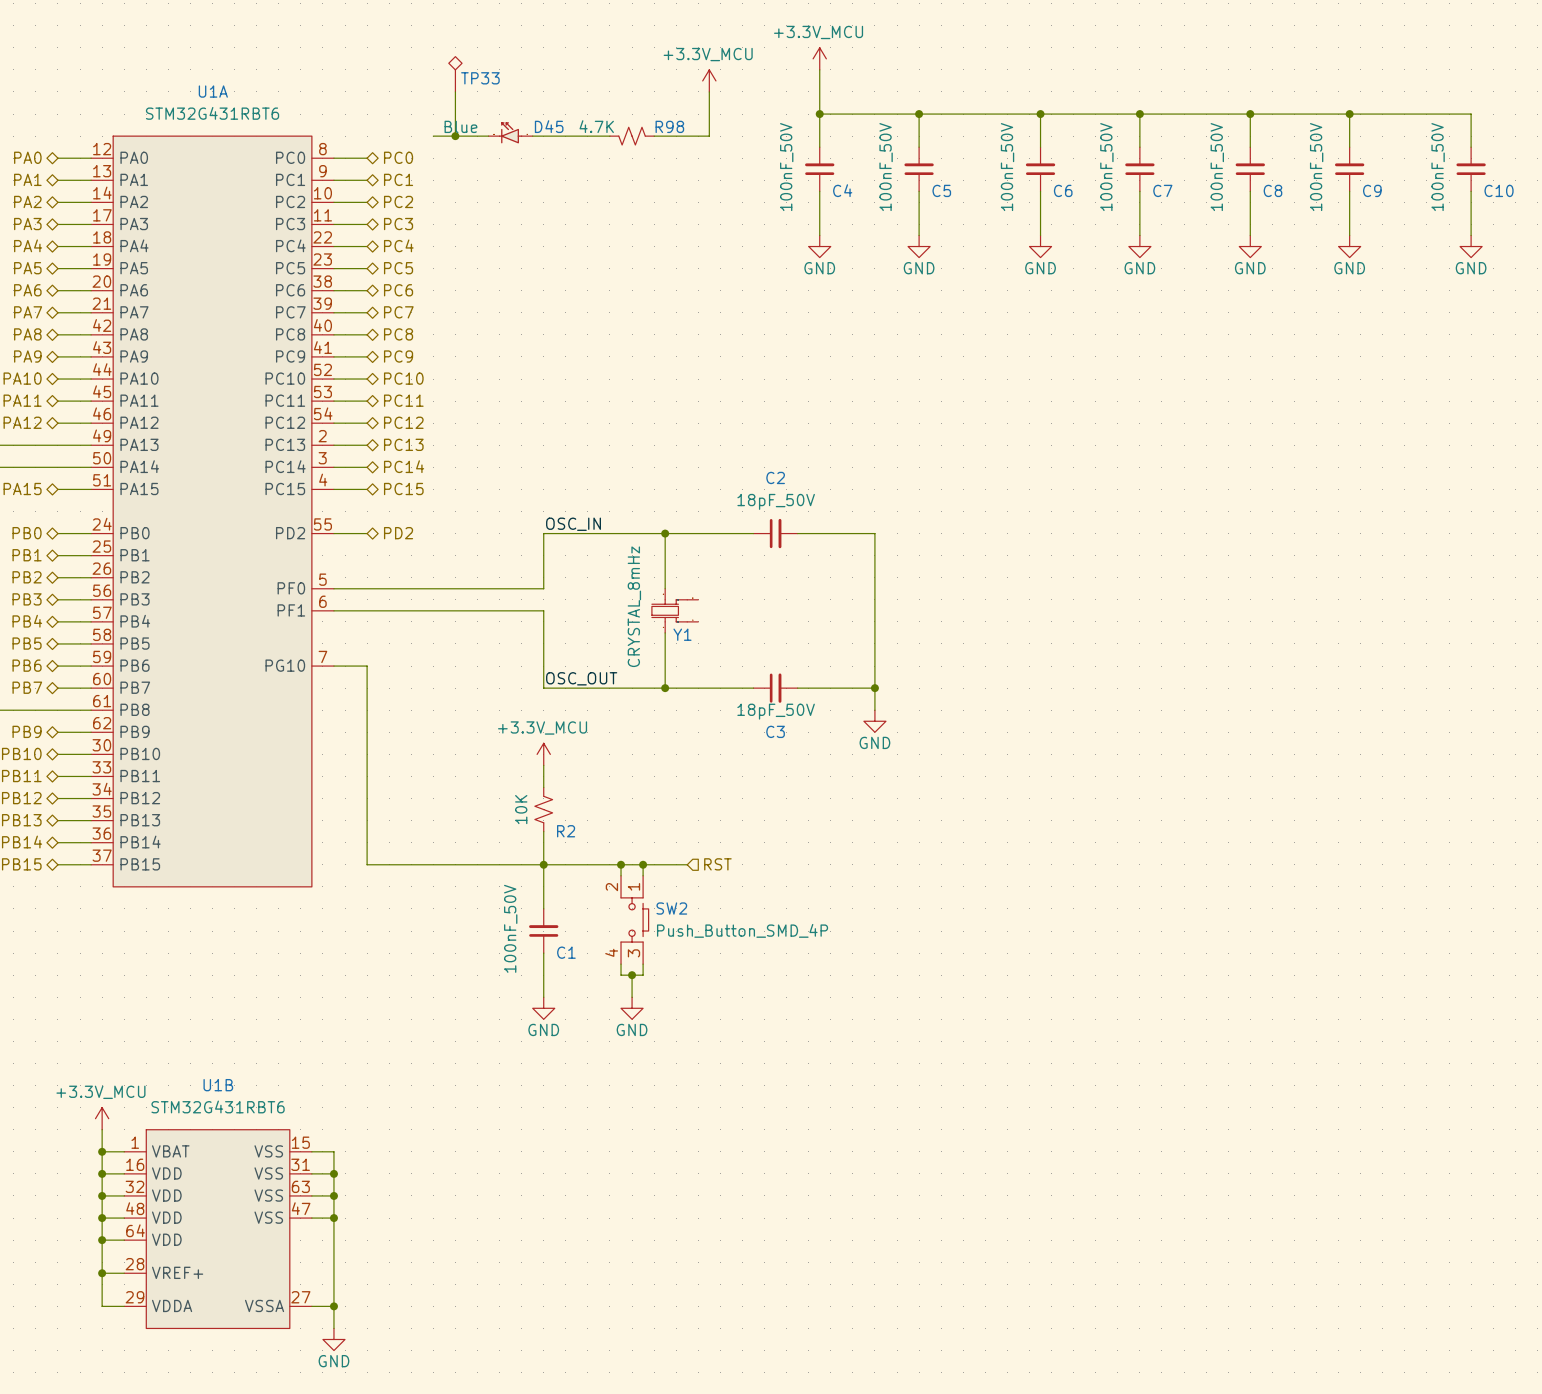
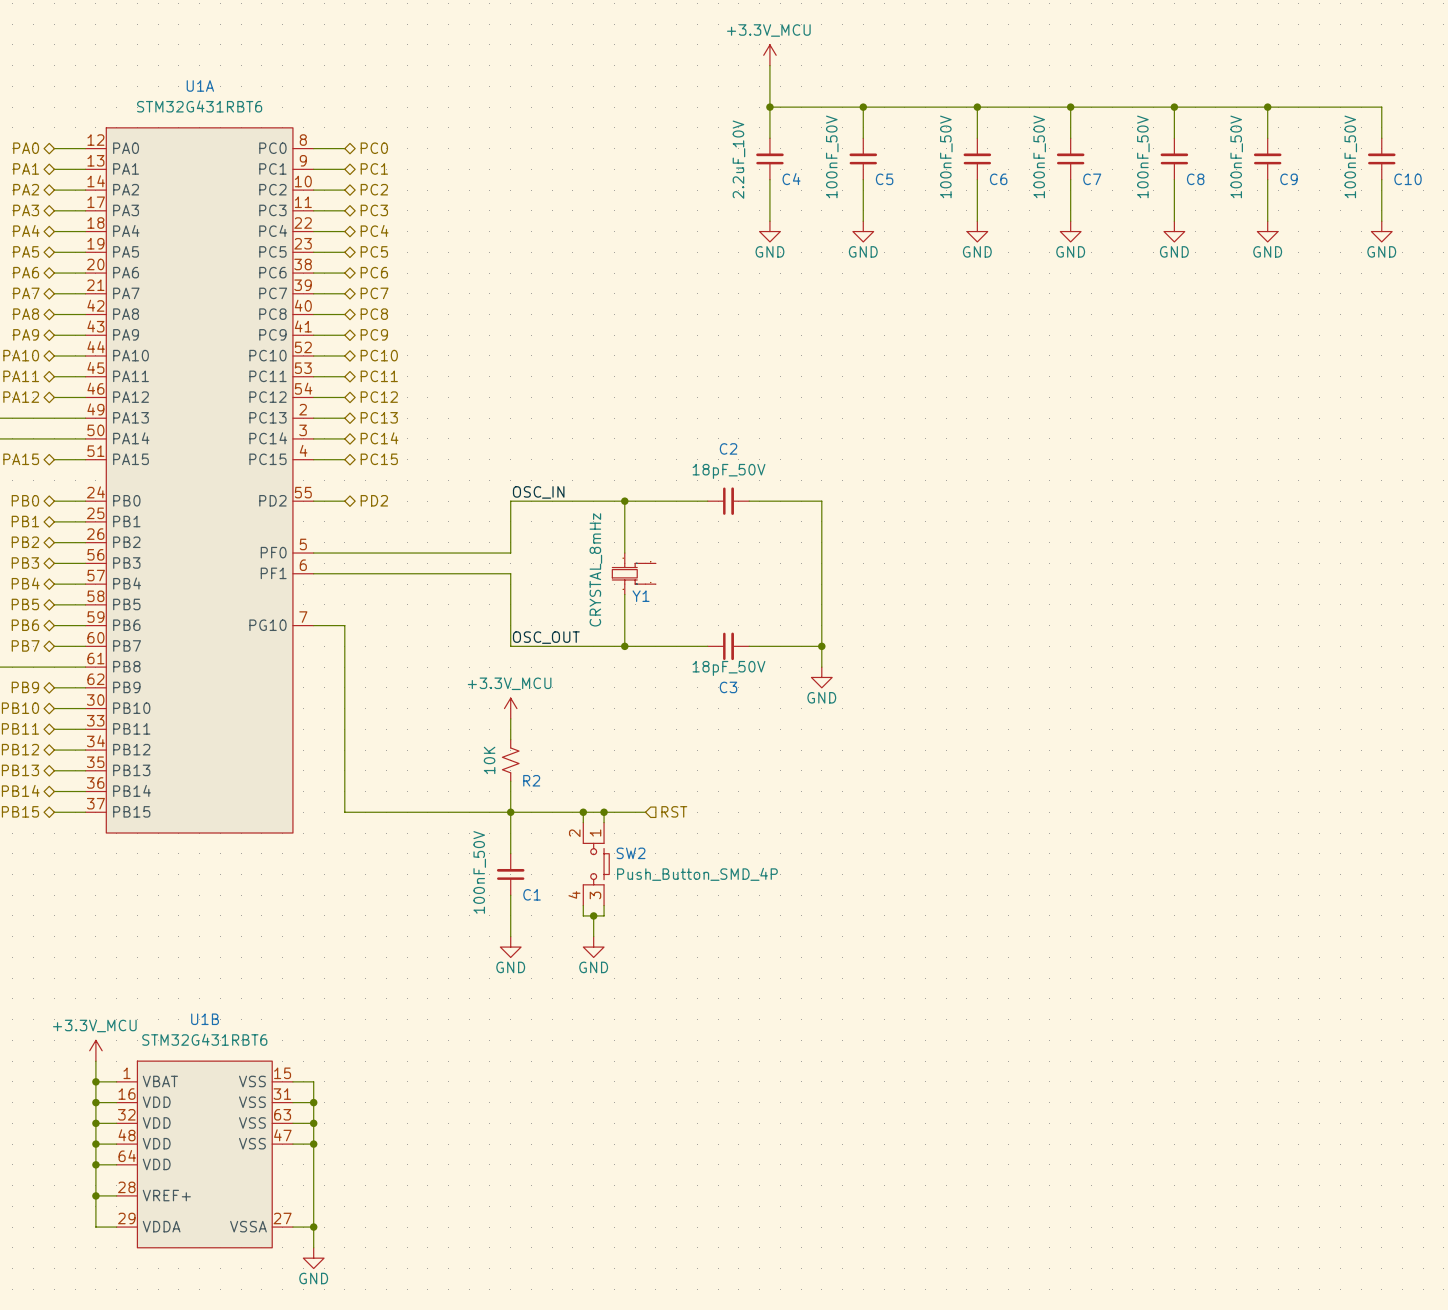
TP33: (455, 74) -> none
power symbol: +3.3V_MCU (709, 80) -> none
wire: (455, 91) (455, 136) -> none
wire: (709, 91) (709, 136) (654, 136) -> none
D45: Blue (510, 132) -> none
wire: (433, 136) (488, 136) -> none
junction: (455, 136) -> none
wire: (532, 136) (609, 136) -> none
R98: 4.7K (632, 136) -> none
C4 value: 100nF_50V (786, 167) -> 2.2uF_10V (738, 159)

